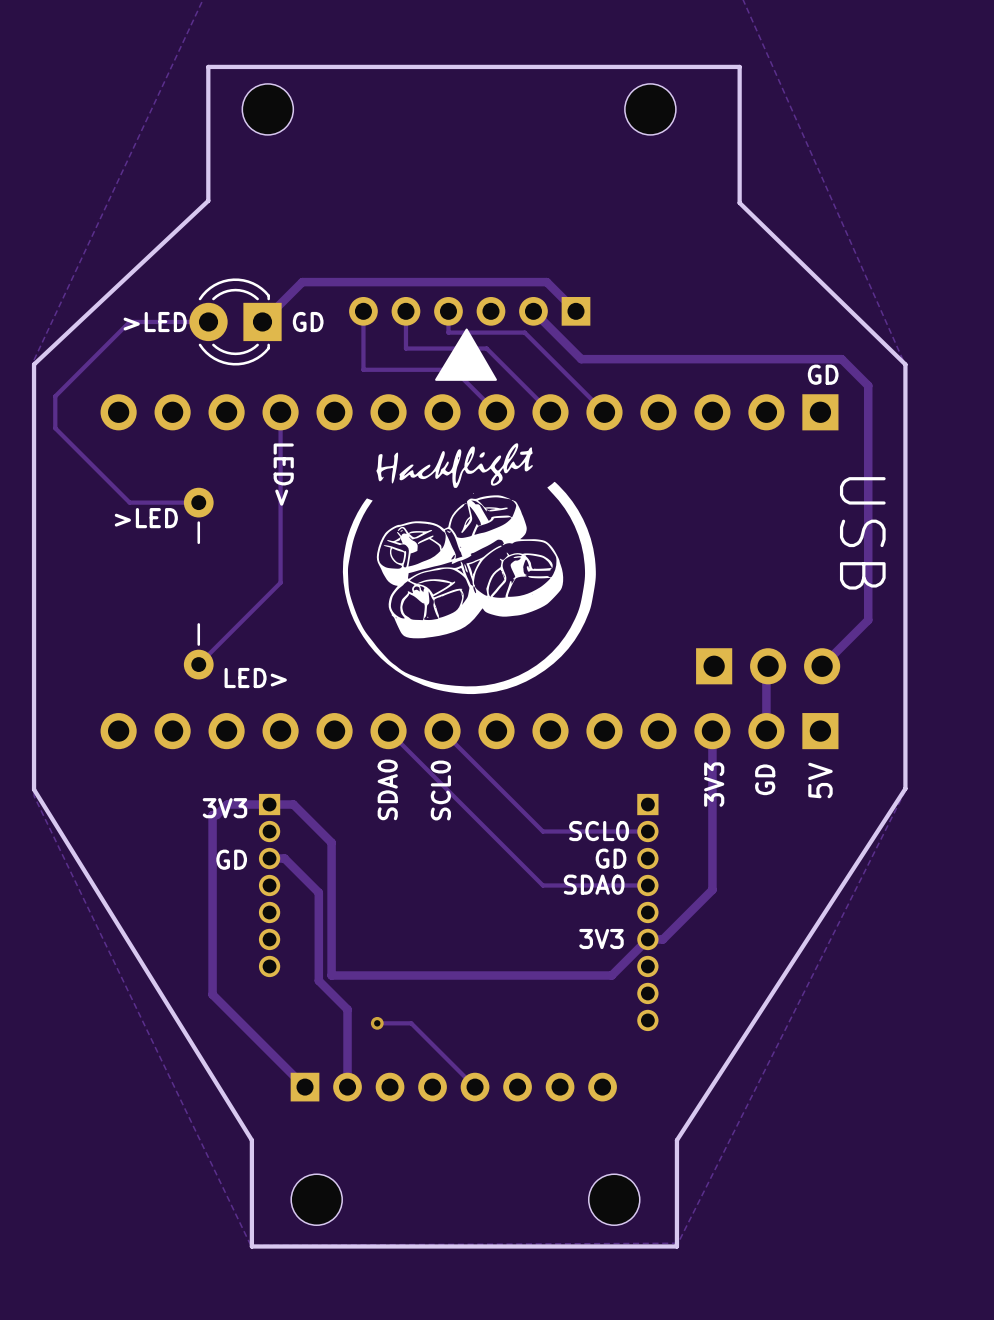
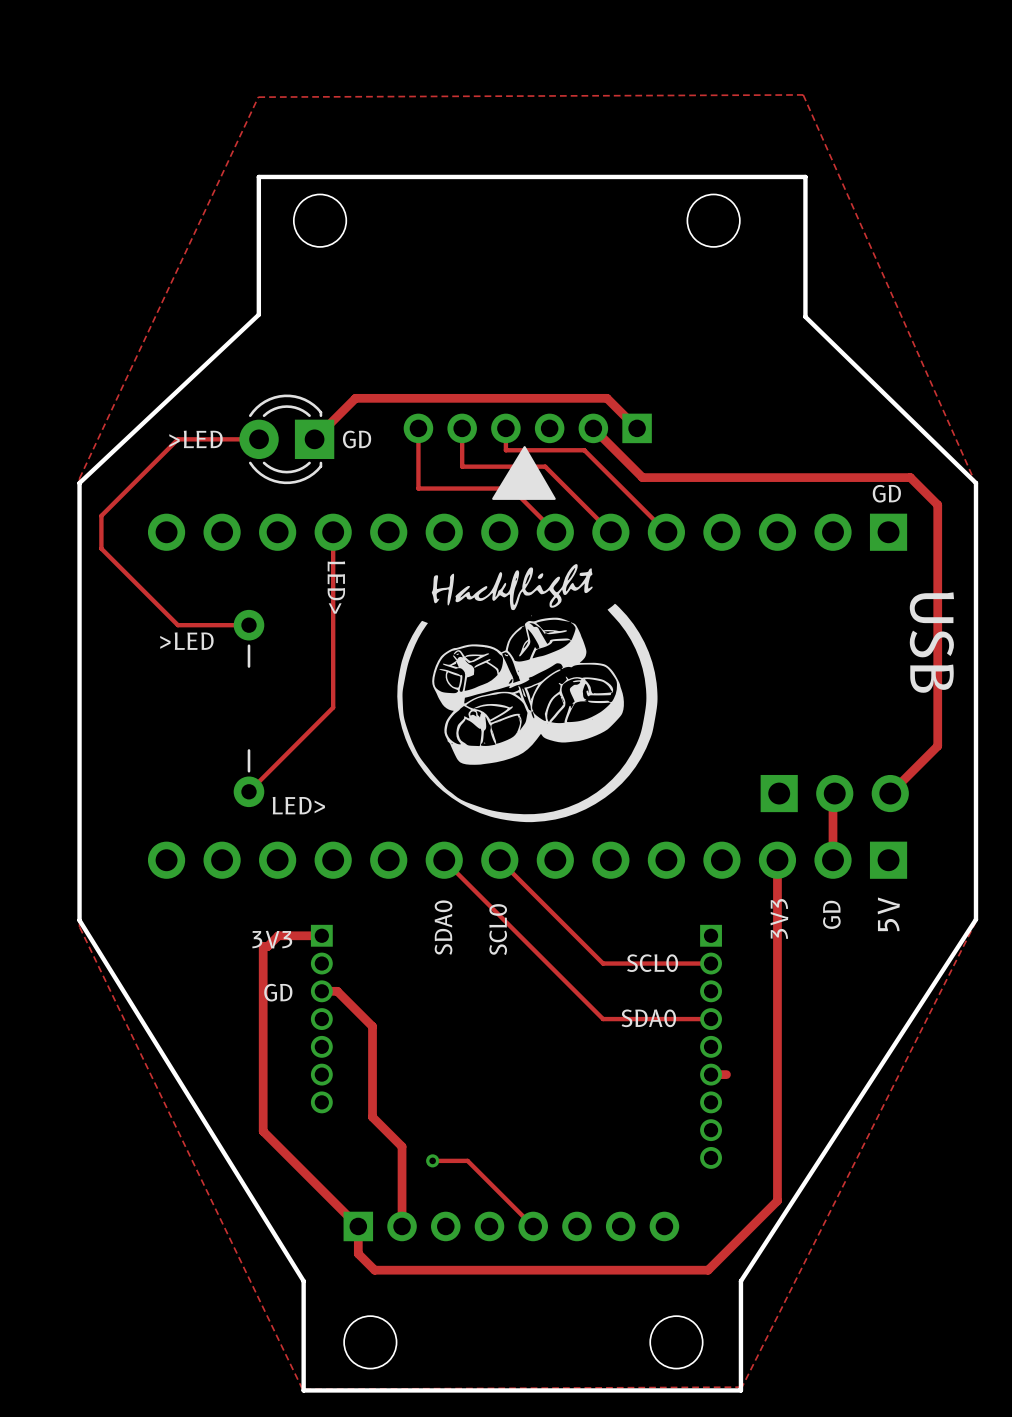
track: (269, 804) (293, 804) (331, 842) (331, 975) (611, 975) (647, 939) -> none
text: GD (611, 858) -> none
track: (712, 889) (662, 939) -> (777, 1023) (777, 1200) (708, 1270) (374, 1270) (358, 1253) (358, 1226)
text: 3V3 (601, 939) -> none

